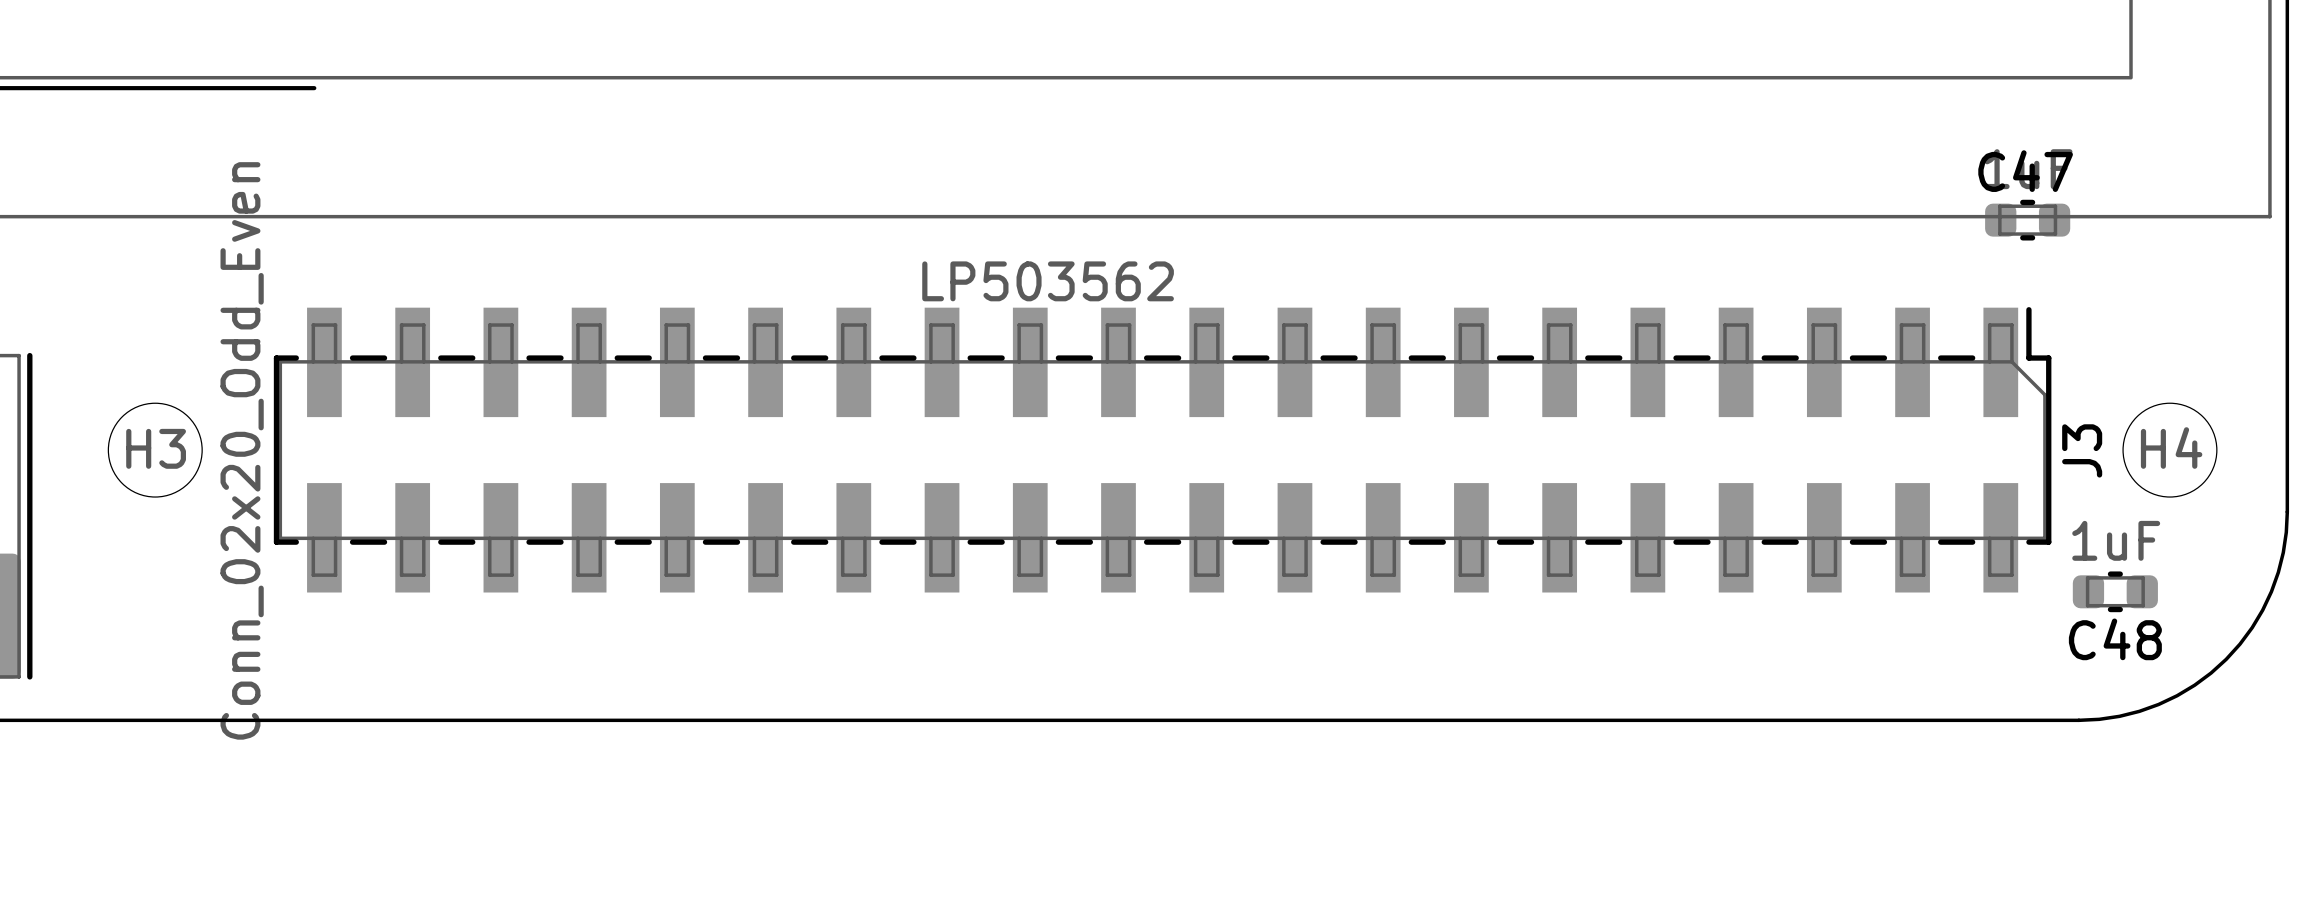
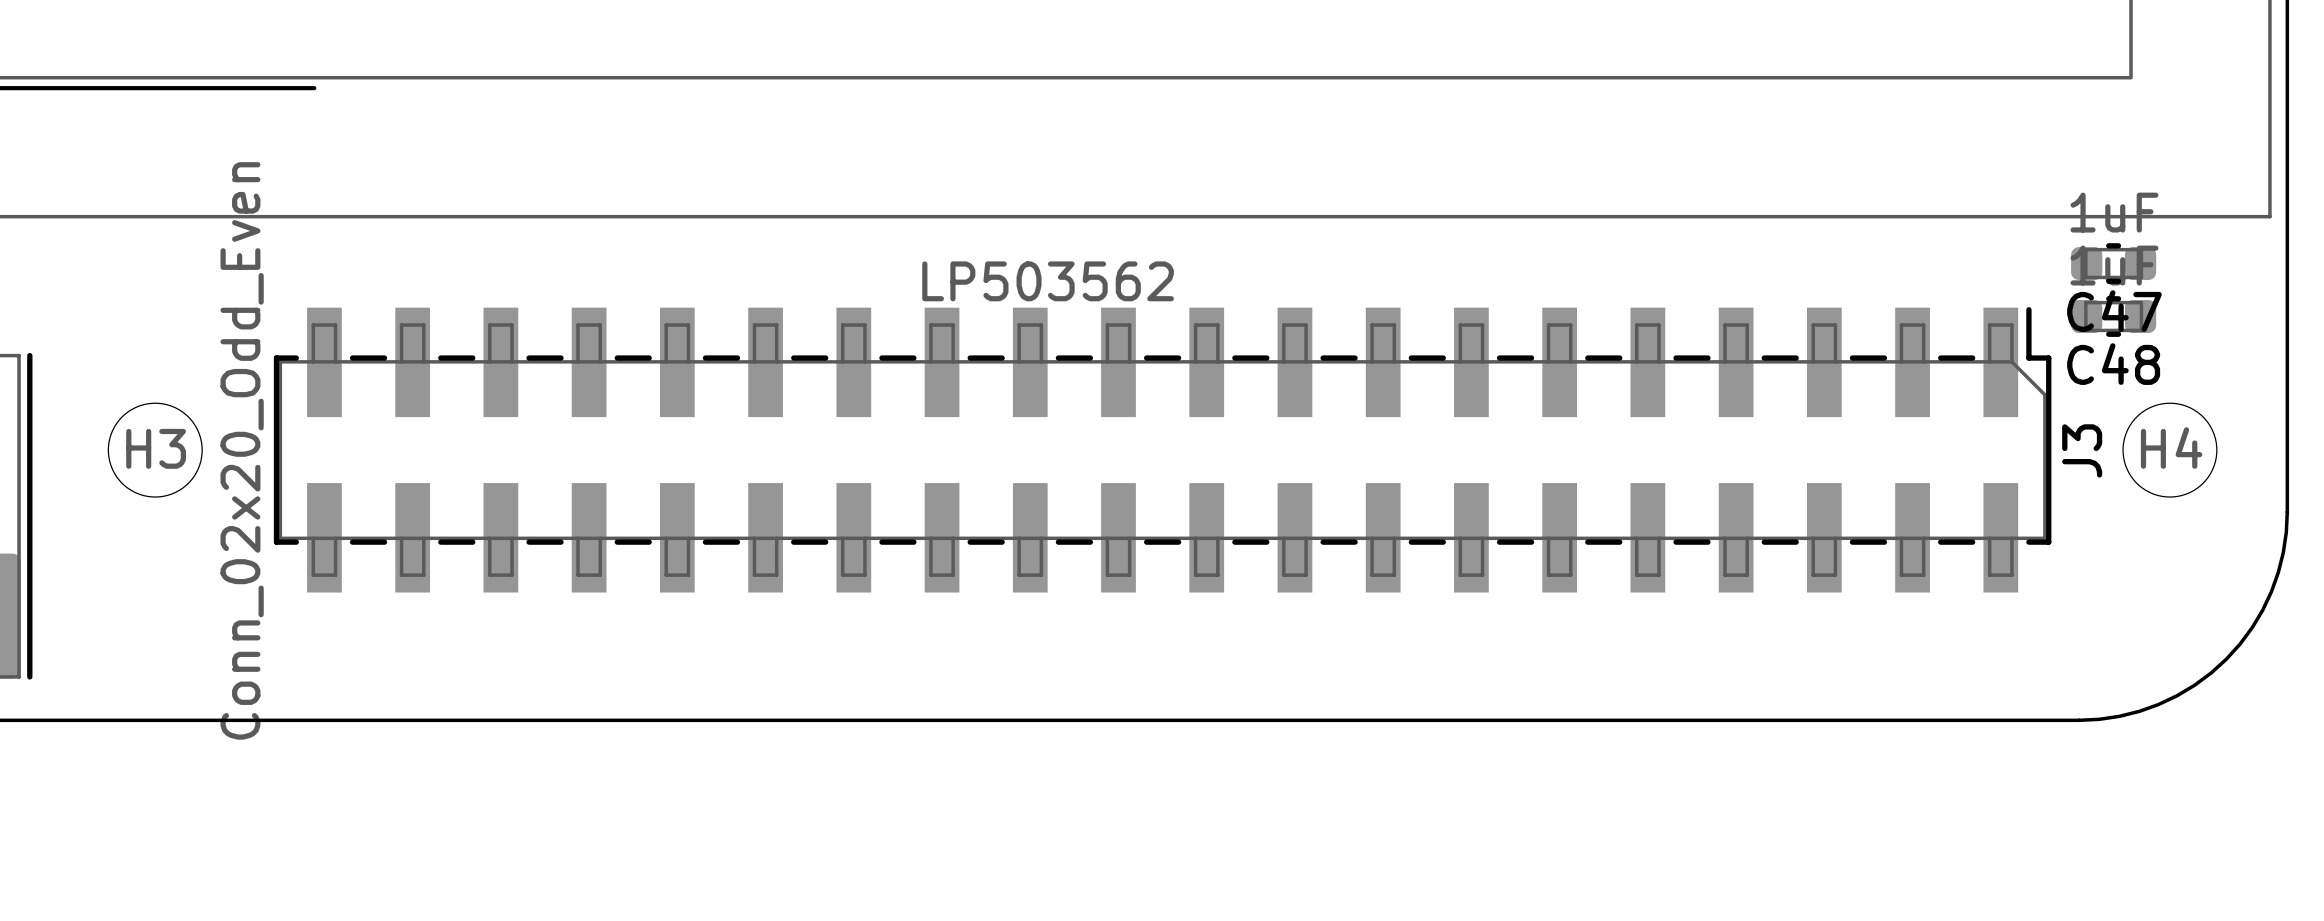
C47 name position: C47 (2025, 171) -> C47 (2114, 311)
C47 position: (2027, 220) -> (2113, 263)
C48 position: (2115, 591) -> (2113, 316)

